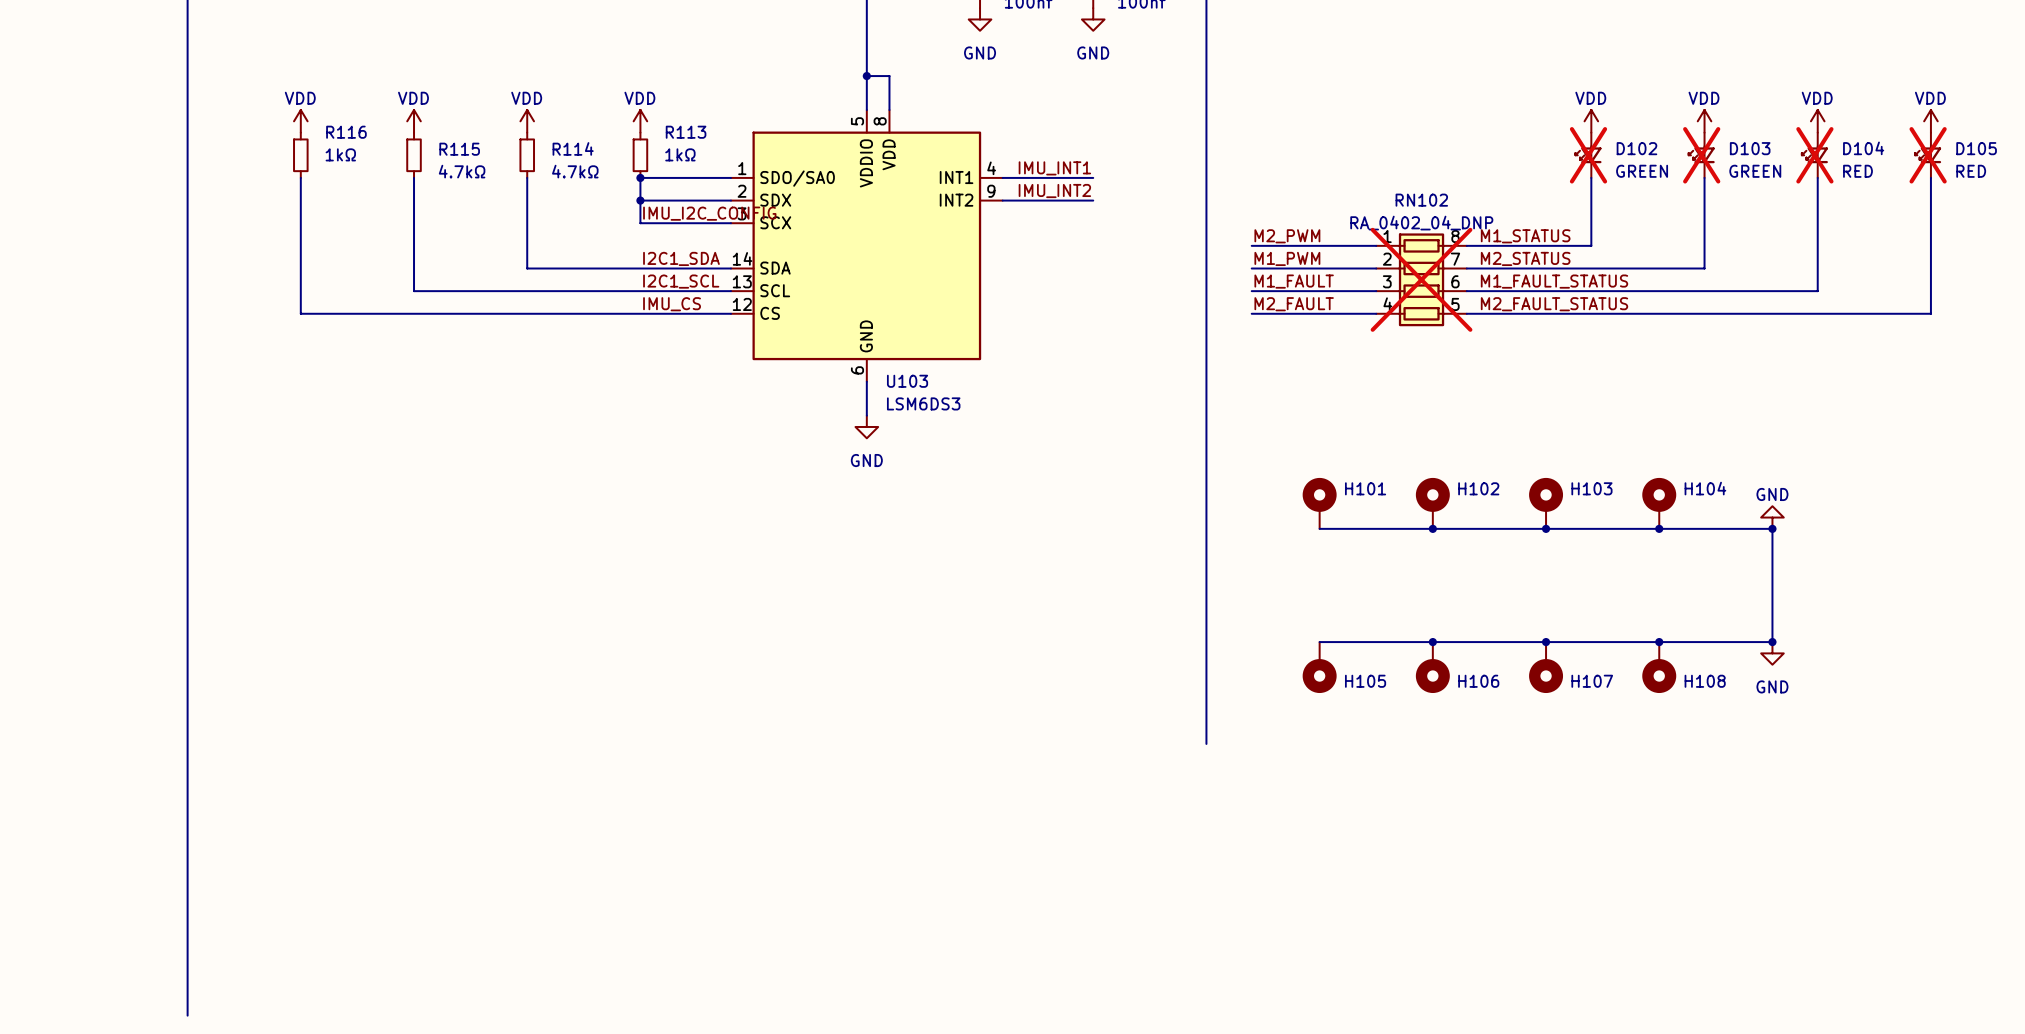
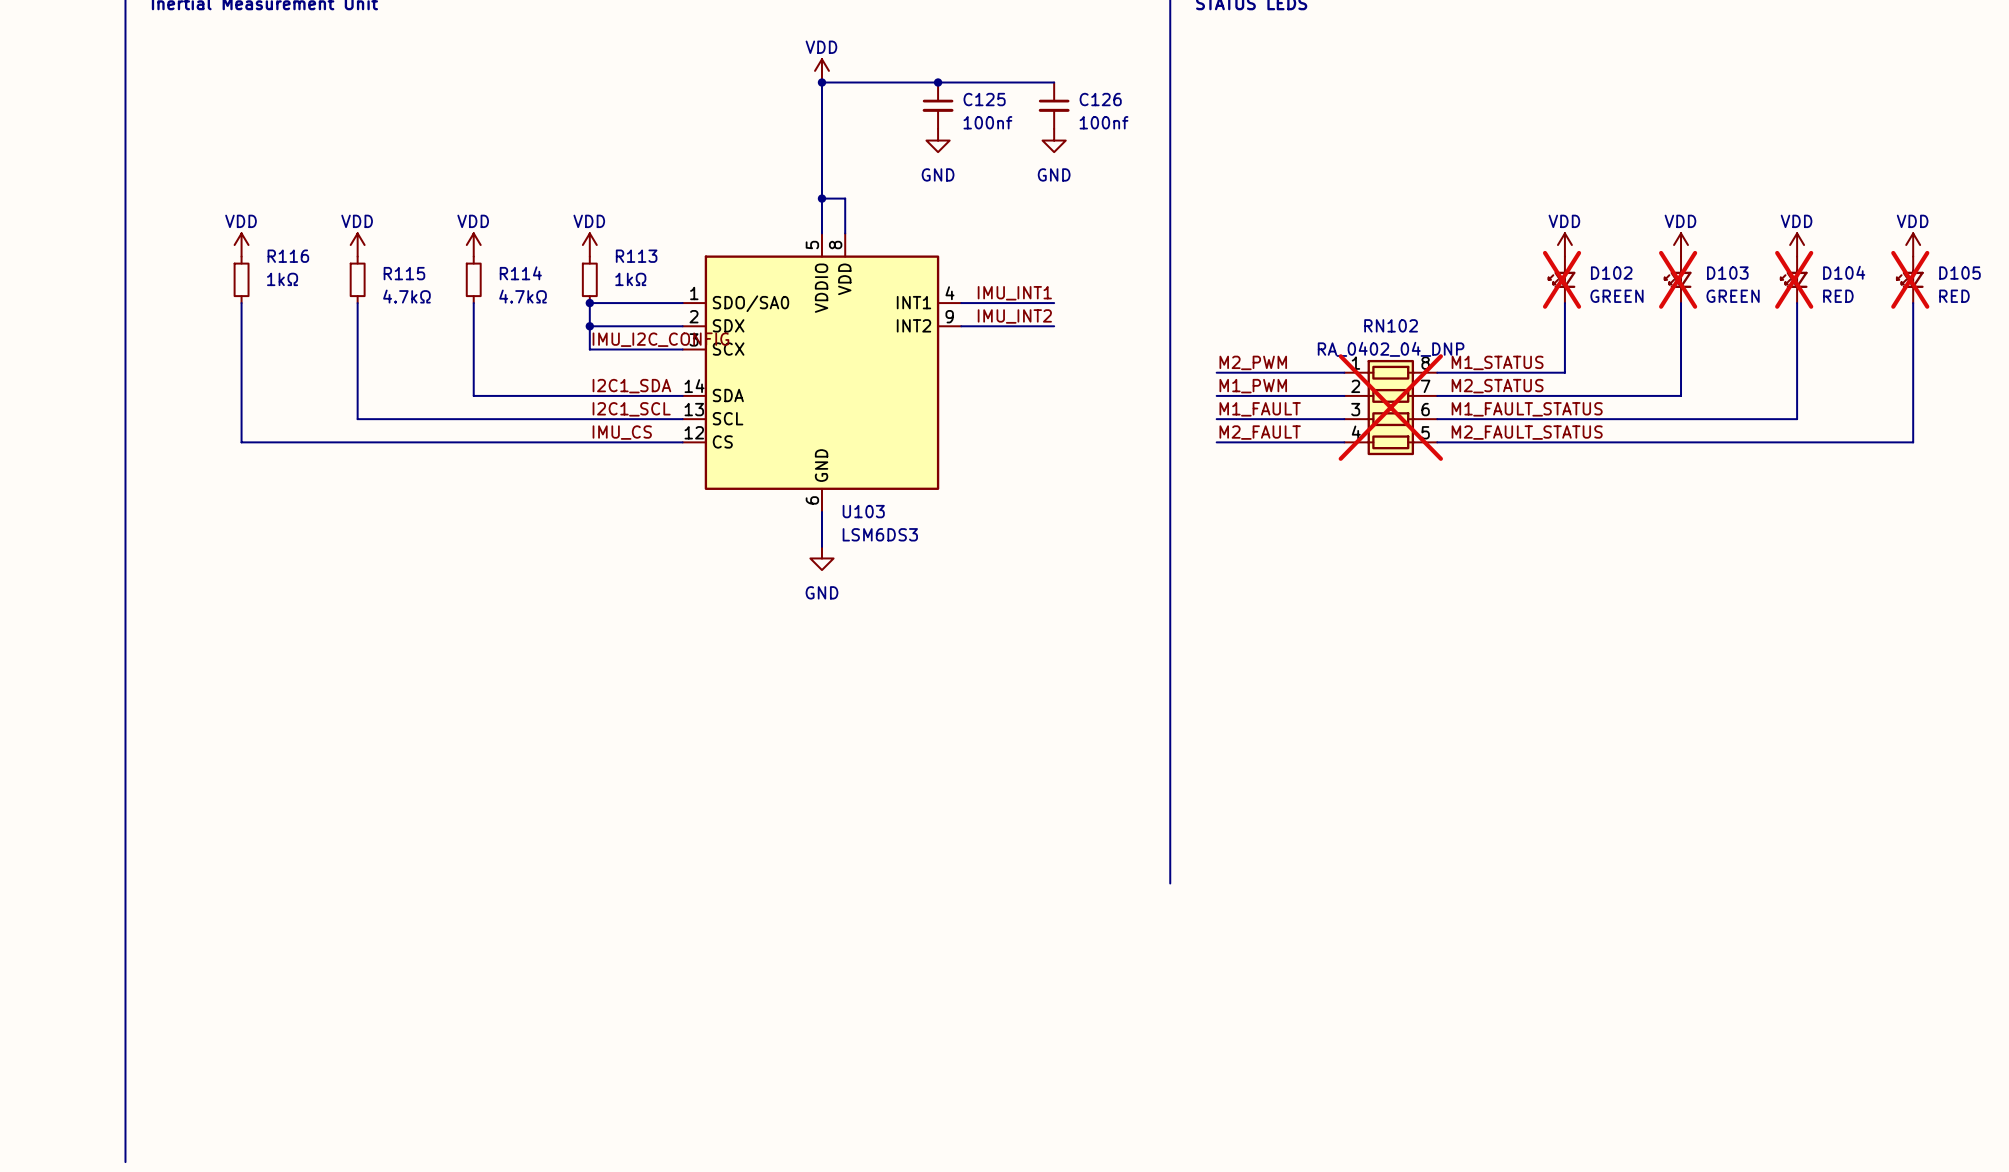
H101: (1319, 503) -> none
H102: (1432, 503) -> none
H103: (1546, 503) -> none
H104: (1659, 503) -> none
power symbol: GND (1772, 517) -> none
wire: (1319, 528) (1772, 528) (1772, 642) (1319, 642) -> none
junction: (1432, 528) -> none
junction: (1546, 528) -> none
junction: (1659, 528) -> none
junction: (1772, 528) -> none
junction: (1432, 642) -> none
junction: (1546, 642) -> none
junction: (1659, 642) -> none
junction: (1772, 642) -> none
power symbol: GND (1772, 653) -> none
H105: (1319, 667) -> none
H106: (1432, 667) -> none
H107: (1546, 667) -> none
H108: (1659, 667) -> none

